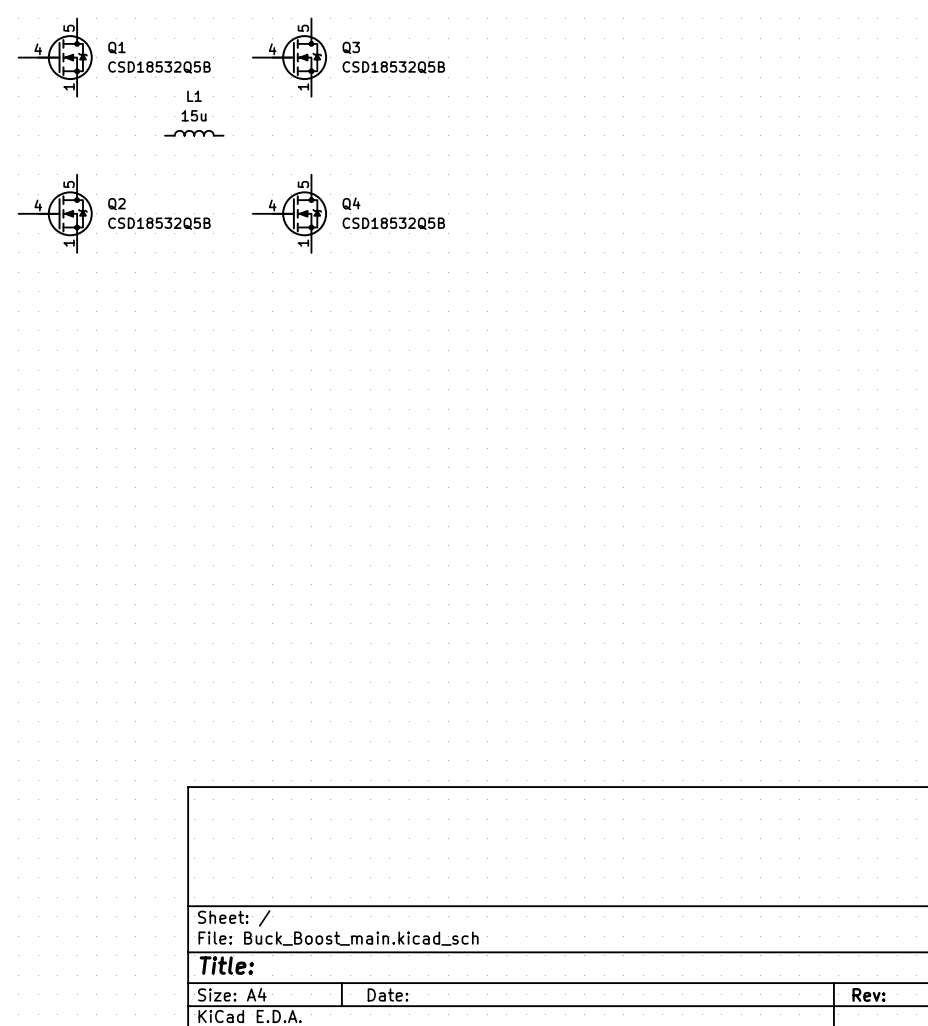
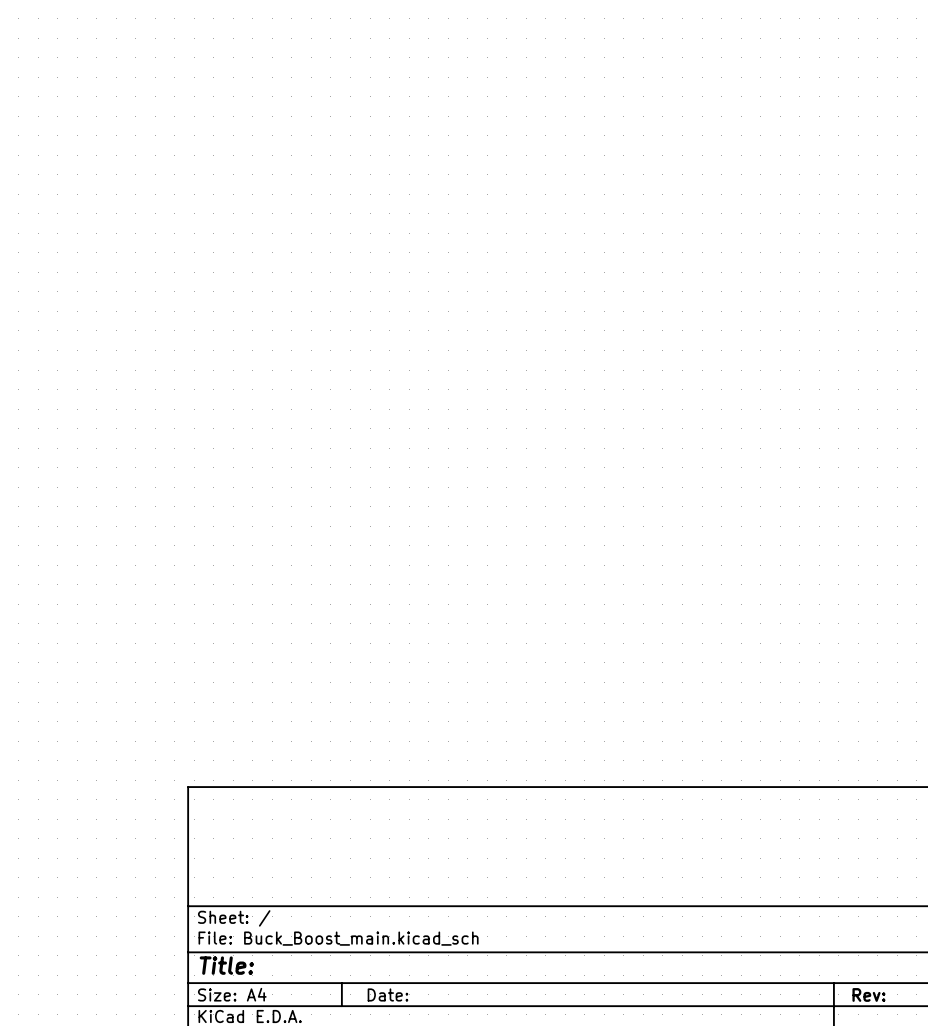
Q1: CSD18532Q5B (55, 57) -> none
Q3: CSD18532Q5B (289, 57) -> none
L1: 15u (194, 133) -> none
Q2: CSD18532Q5B (55, 213) -> none
Q4: CSD18532Q5B (289, 213) -> none

